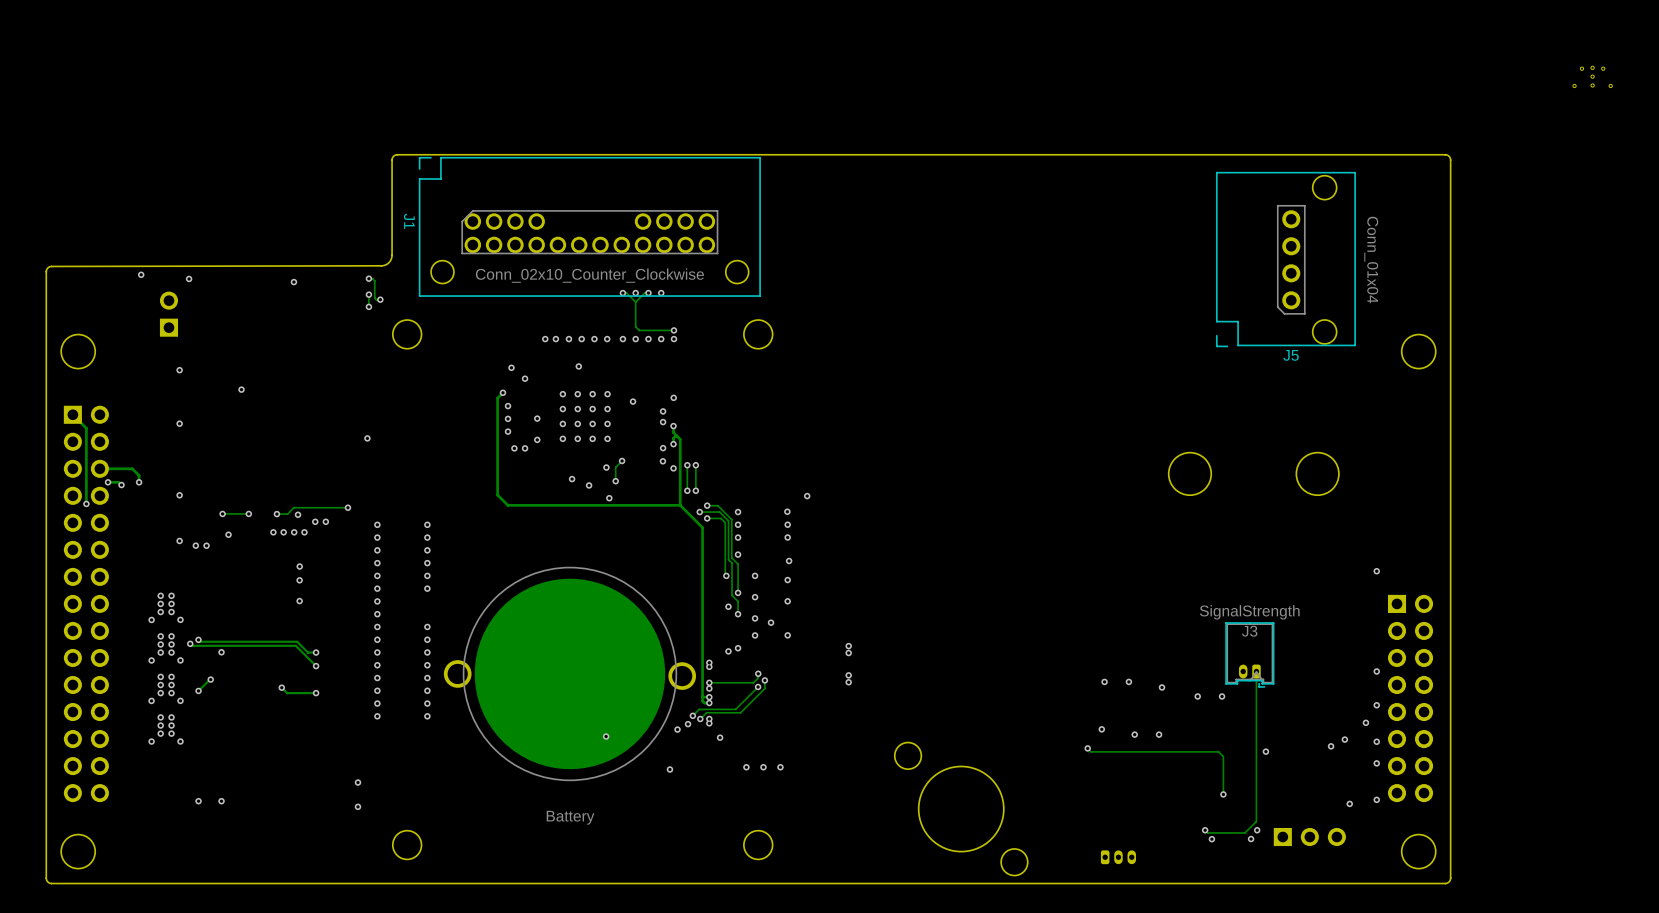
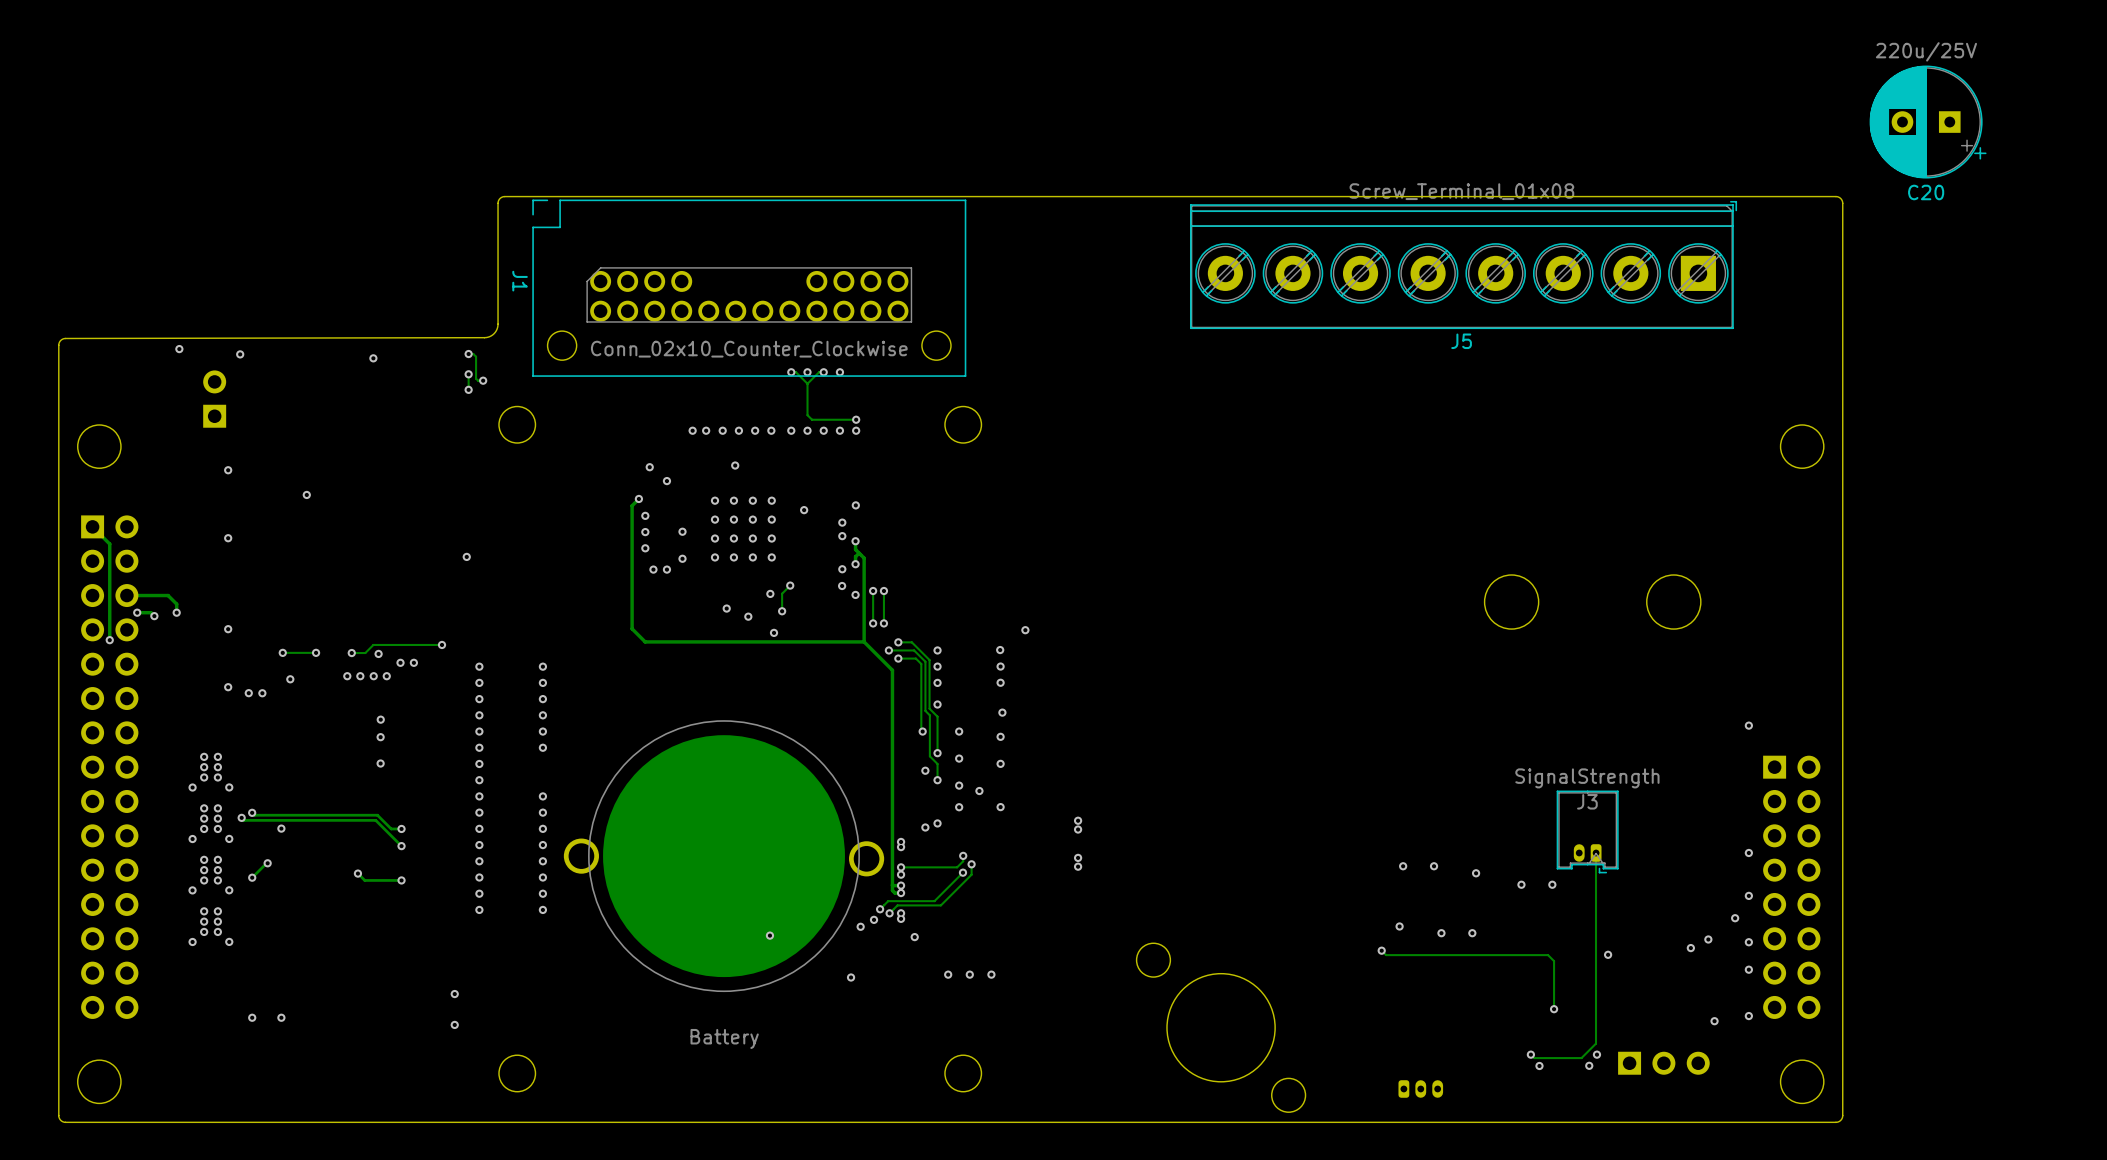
part: (1592, 76) -> none
C20: none -> 220u/25V (1928, 122)
J5 footprint: [1216, 172, 1356, 348] -> [1189, 200, 1738, 330]
J5 value: Conn_01x04 (1371, 259) -> Screw_Terminal_01x08 (1461, 191)
J5 name position: J5 (1291, 355) -> J5 (1461, 341)

